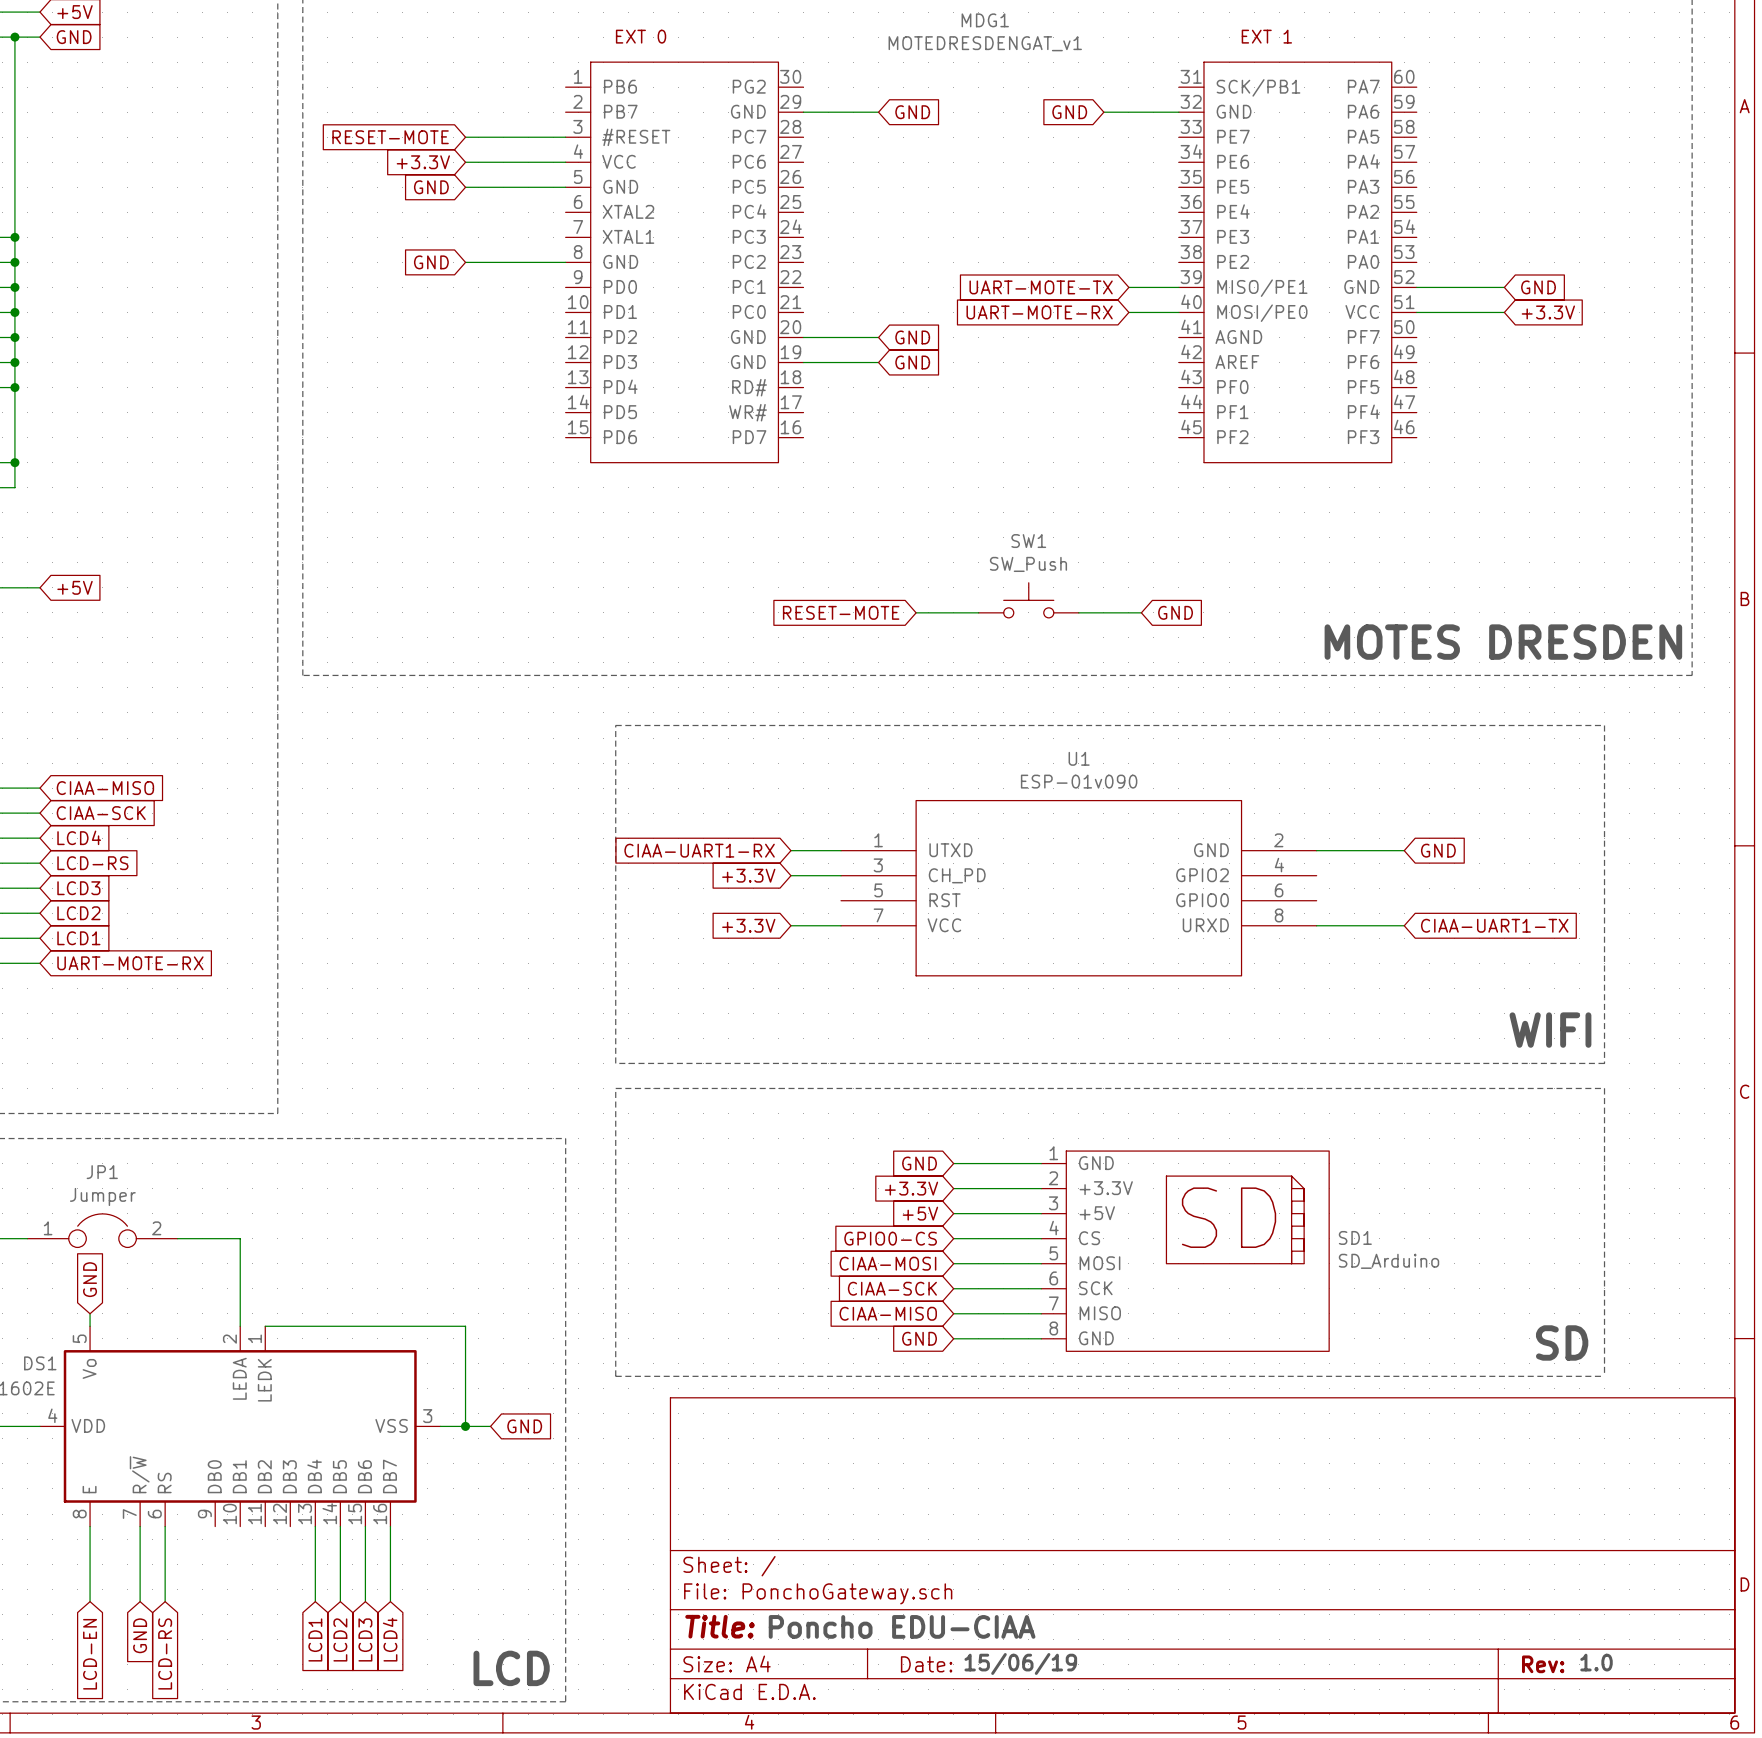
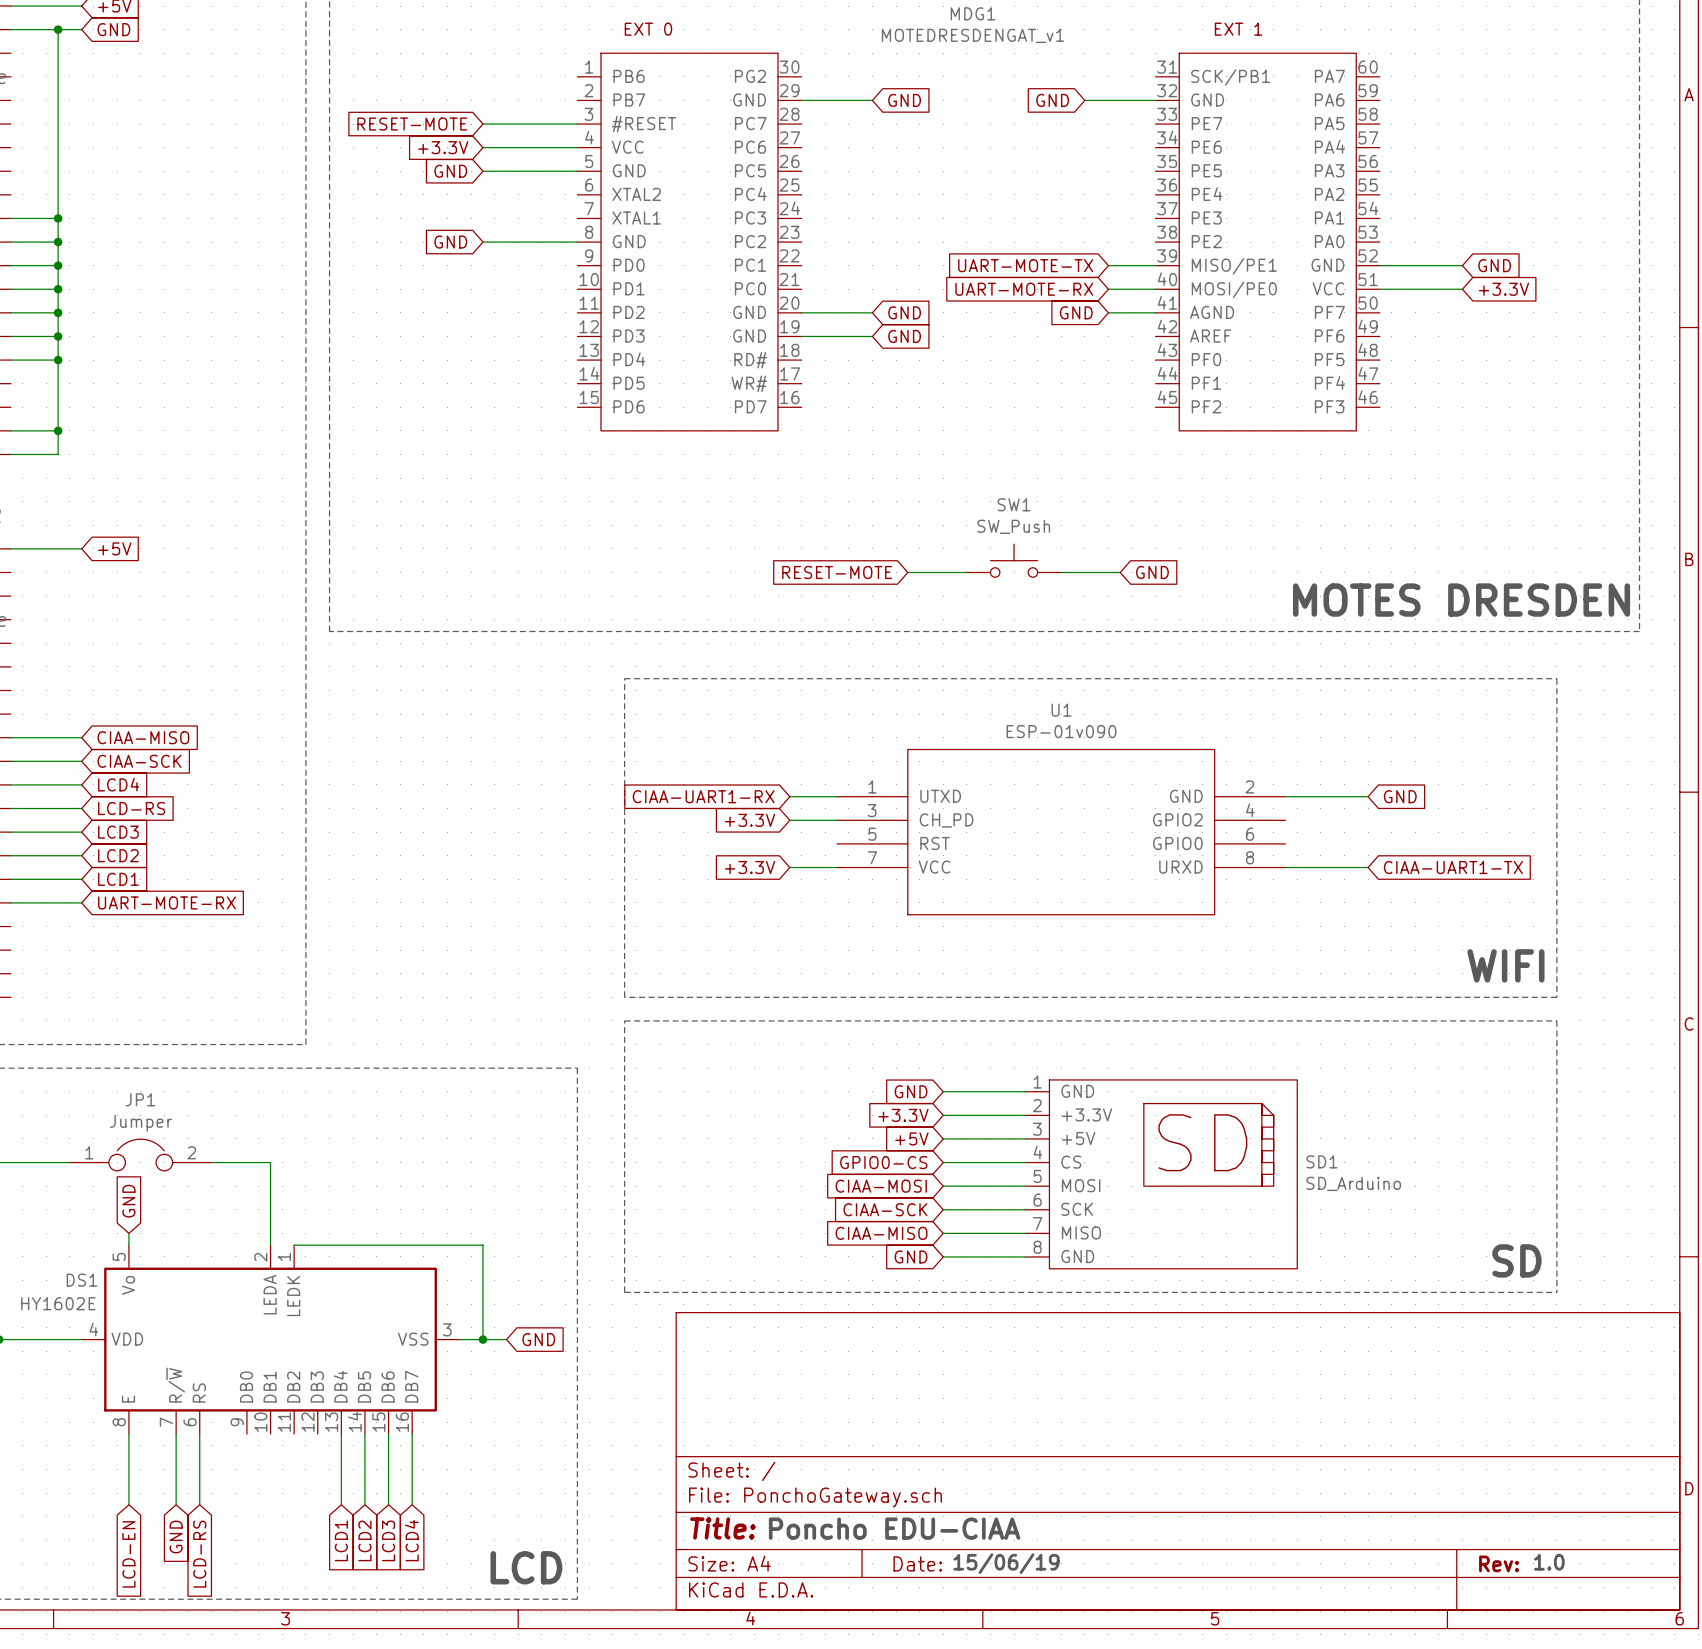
global label: none -> GND (1076, 312)
wire: none -> (1108, 312) (1155, 312)

